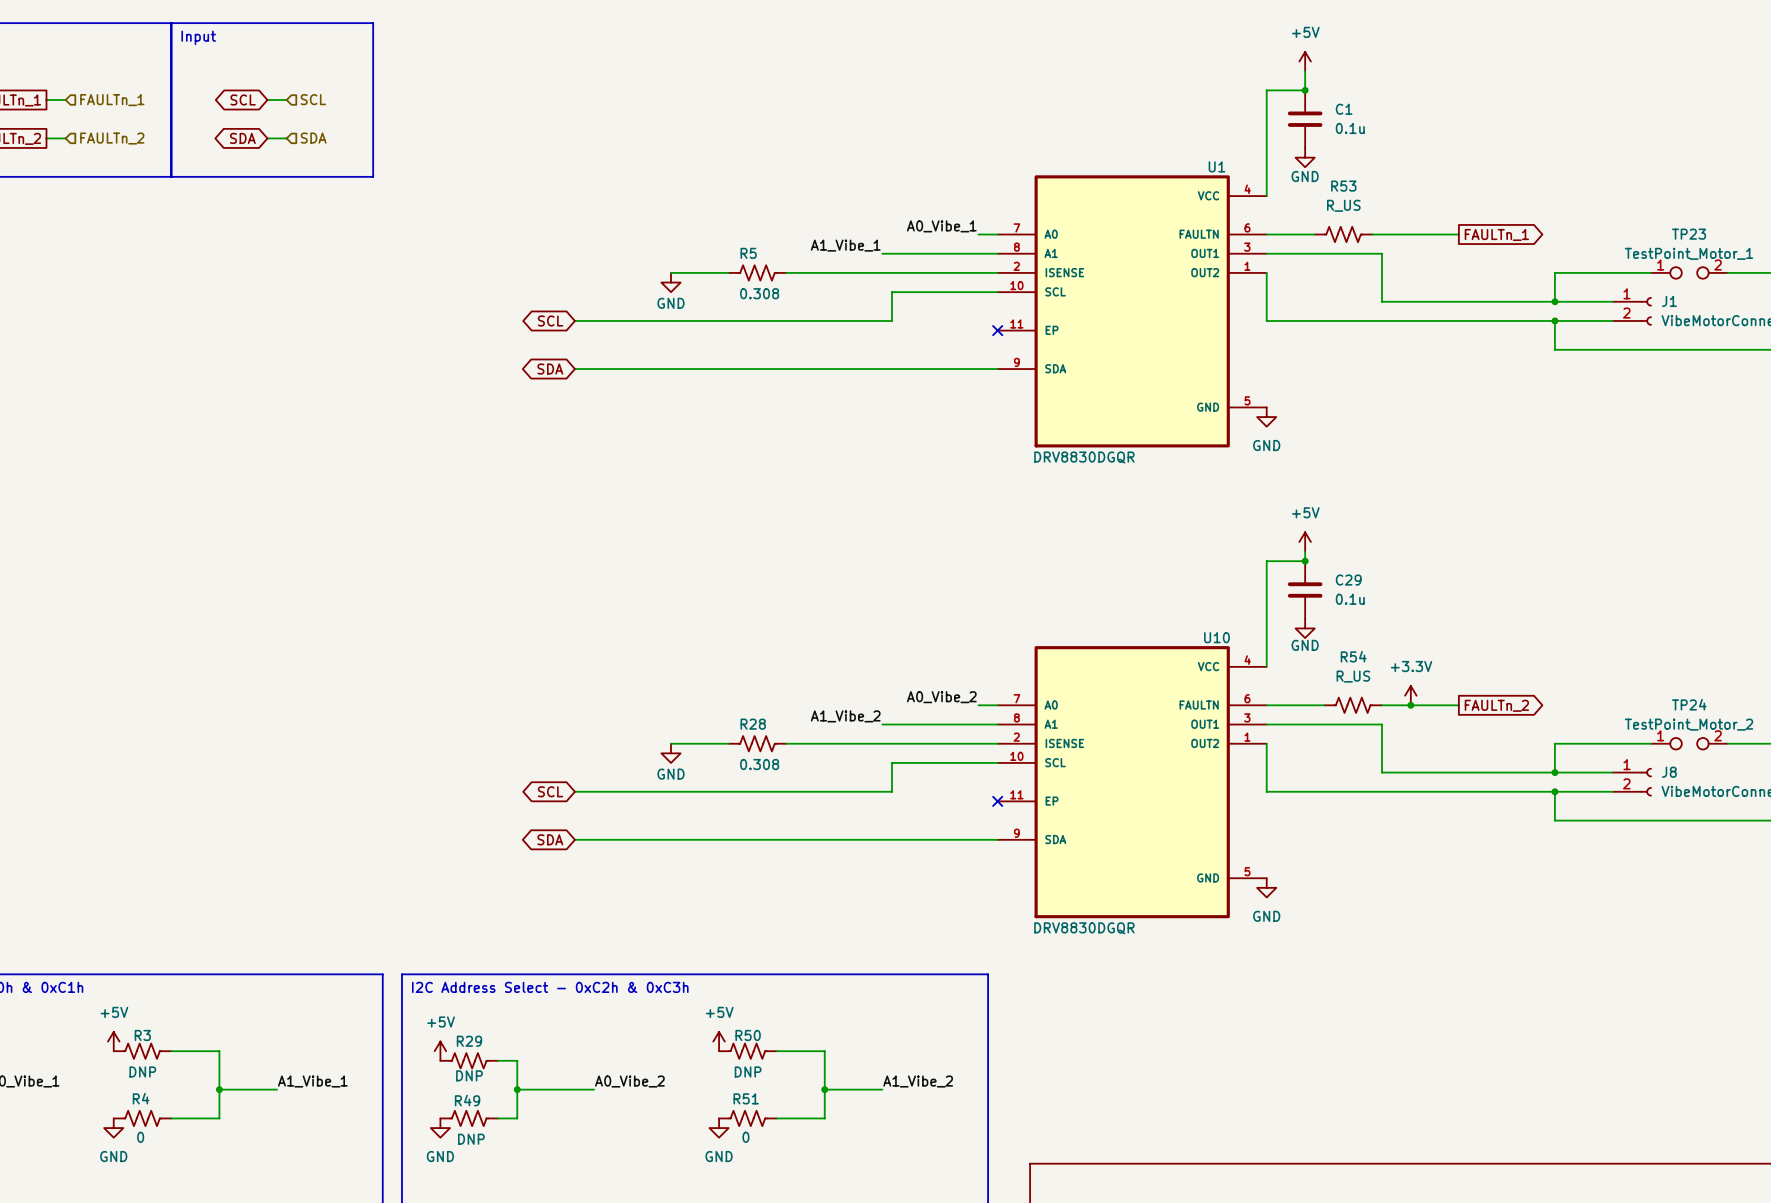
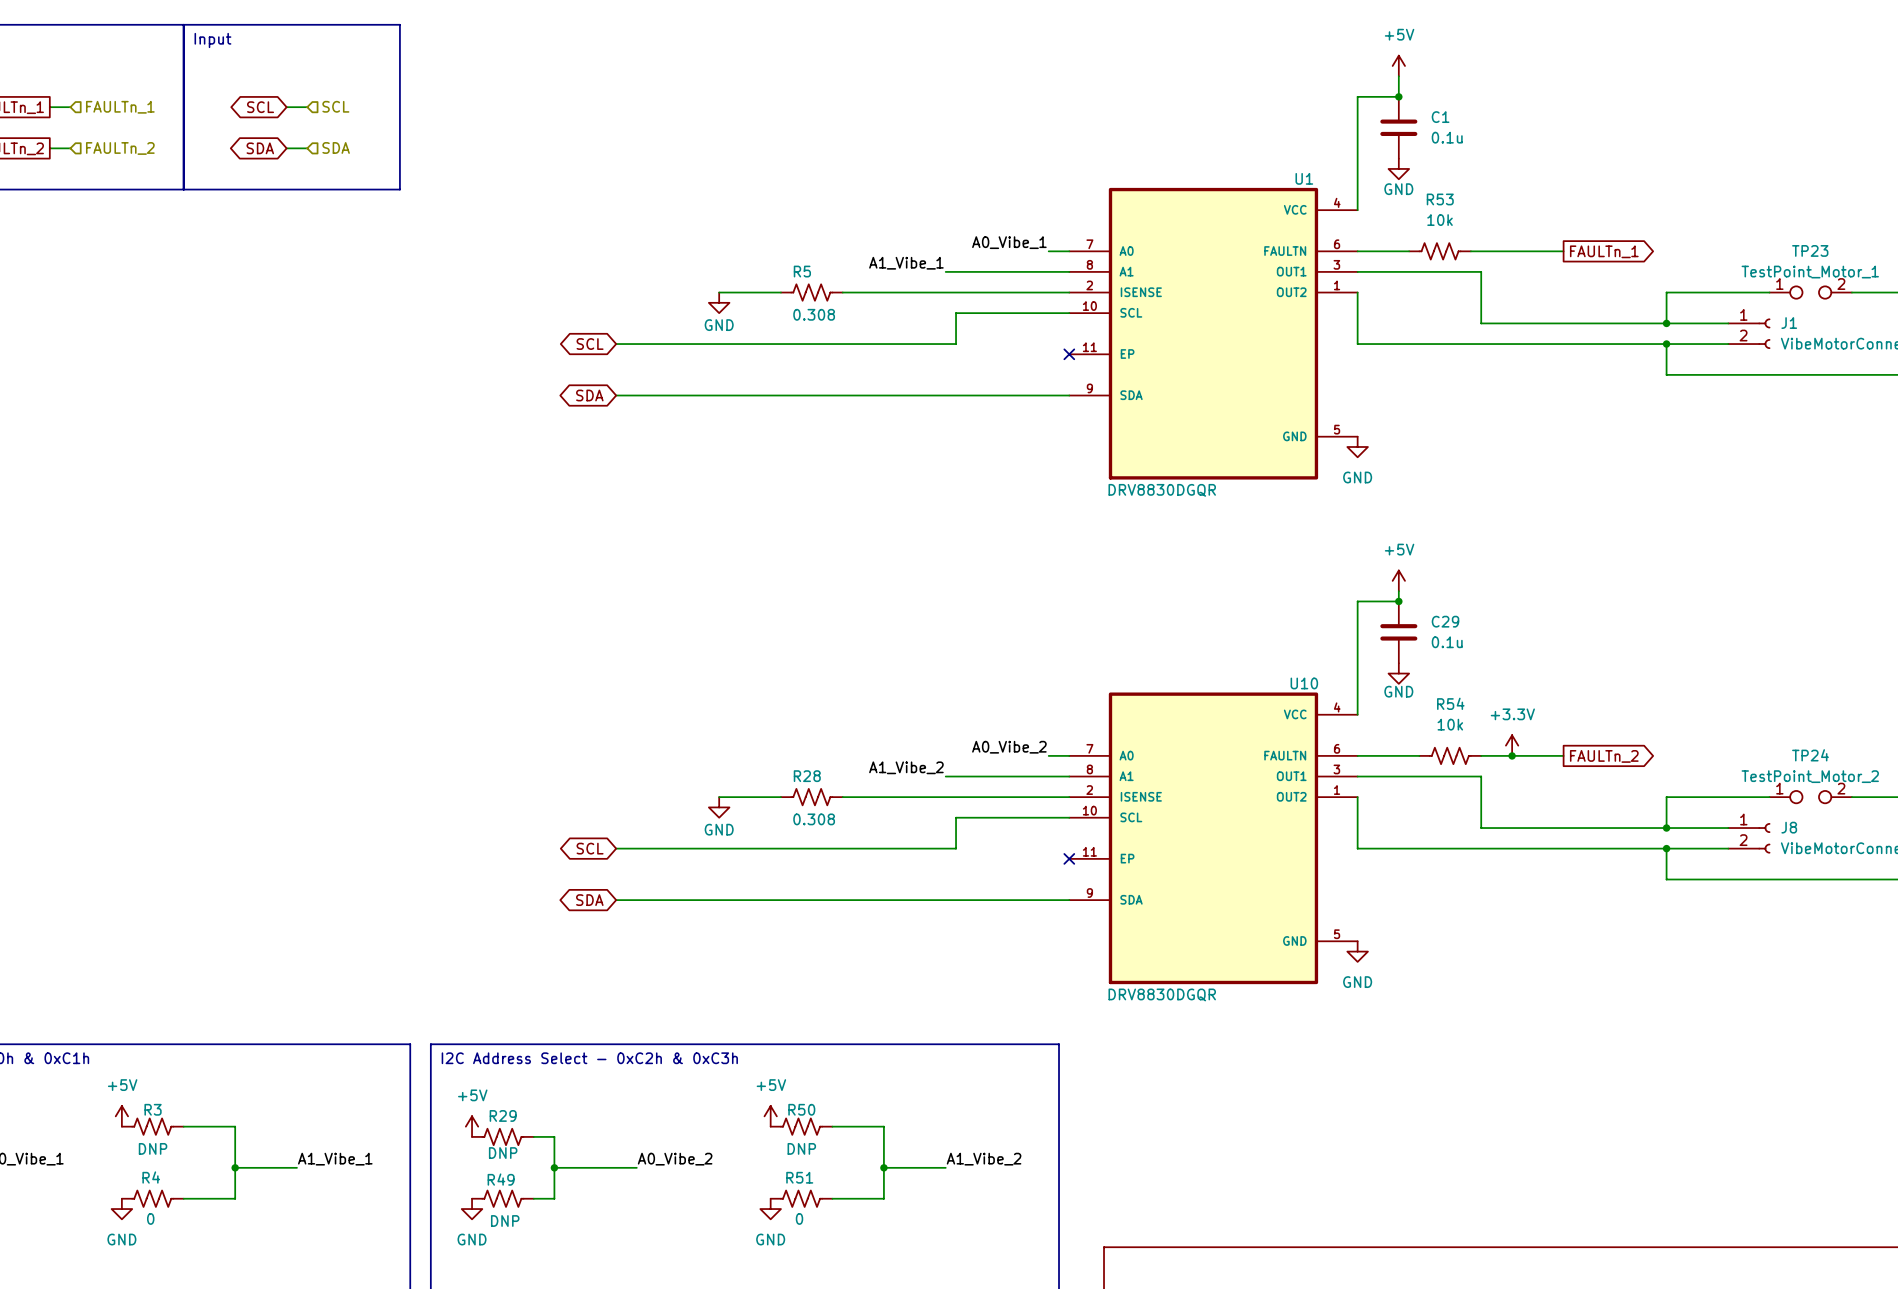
R53 value: R_US (1343, 205) -> 10k (1440, 220)
R54 value: R_US (1353, 676) -> 10k (1450, 724)

